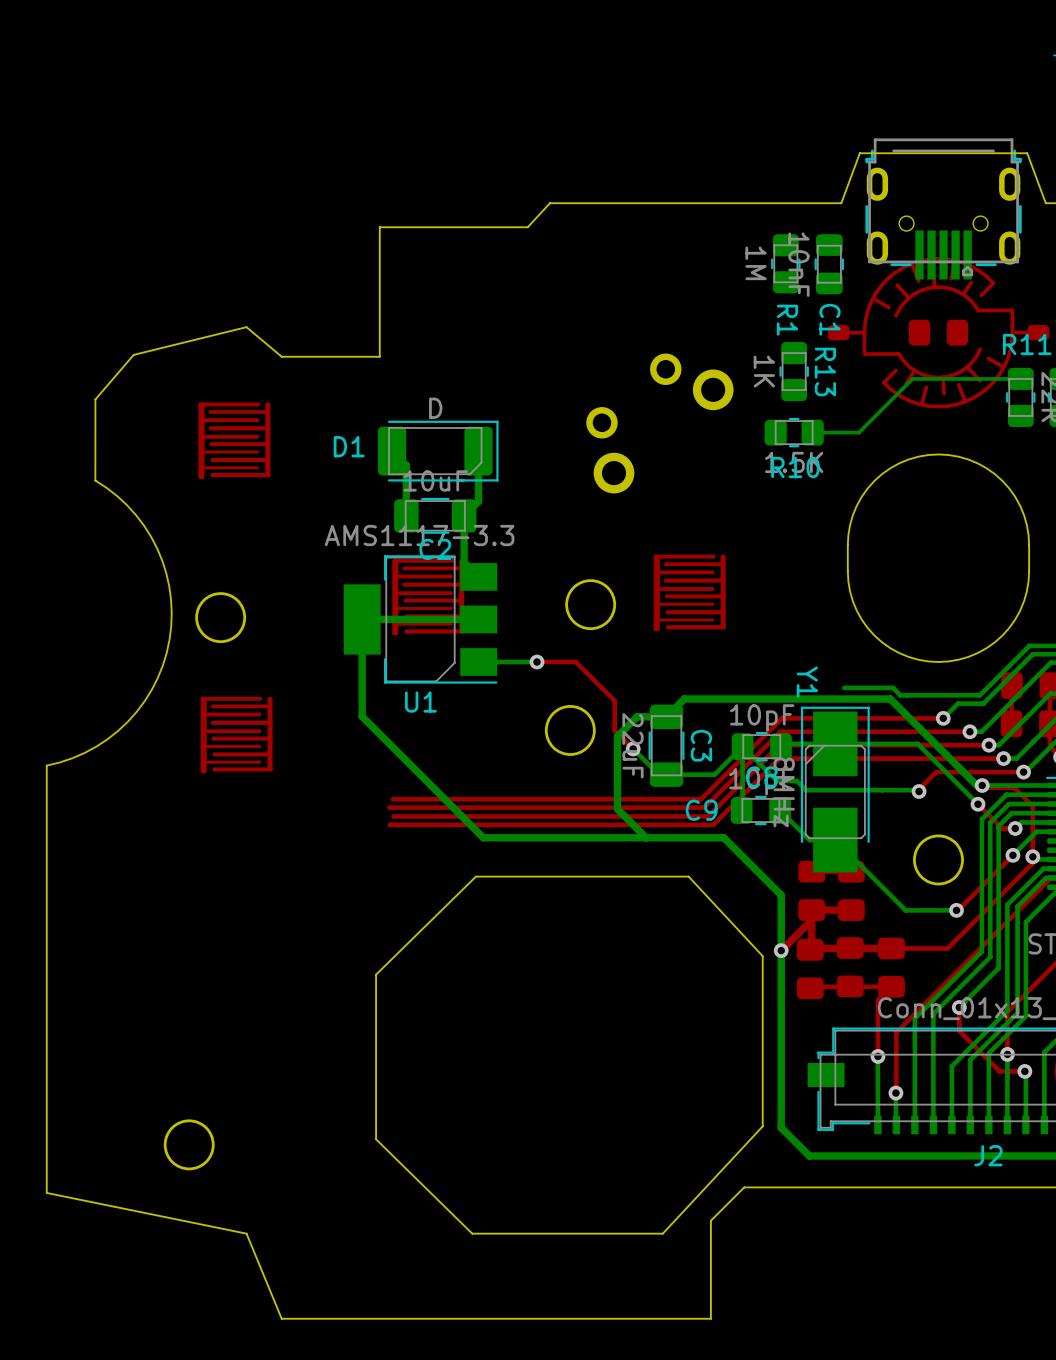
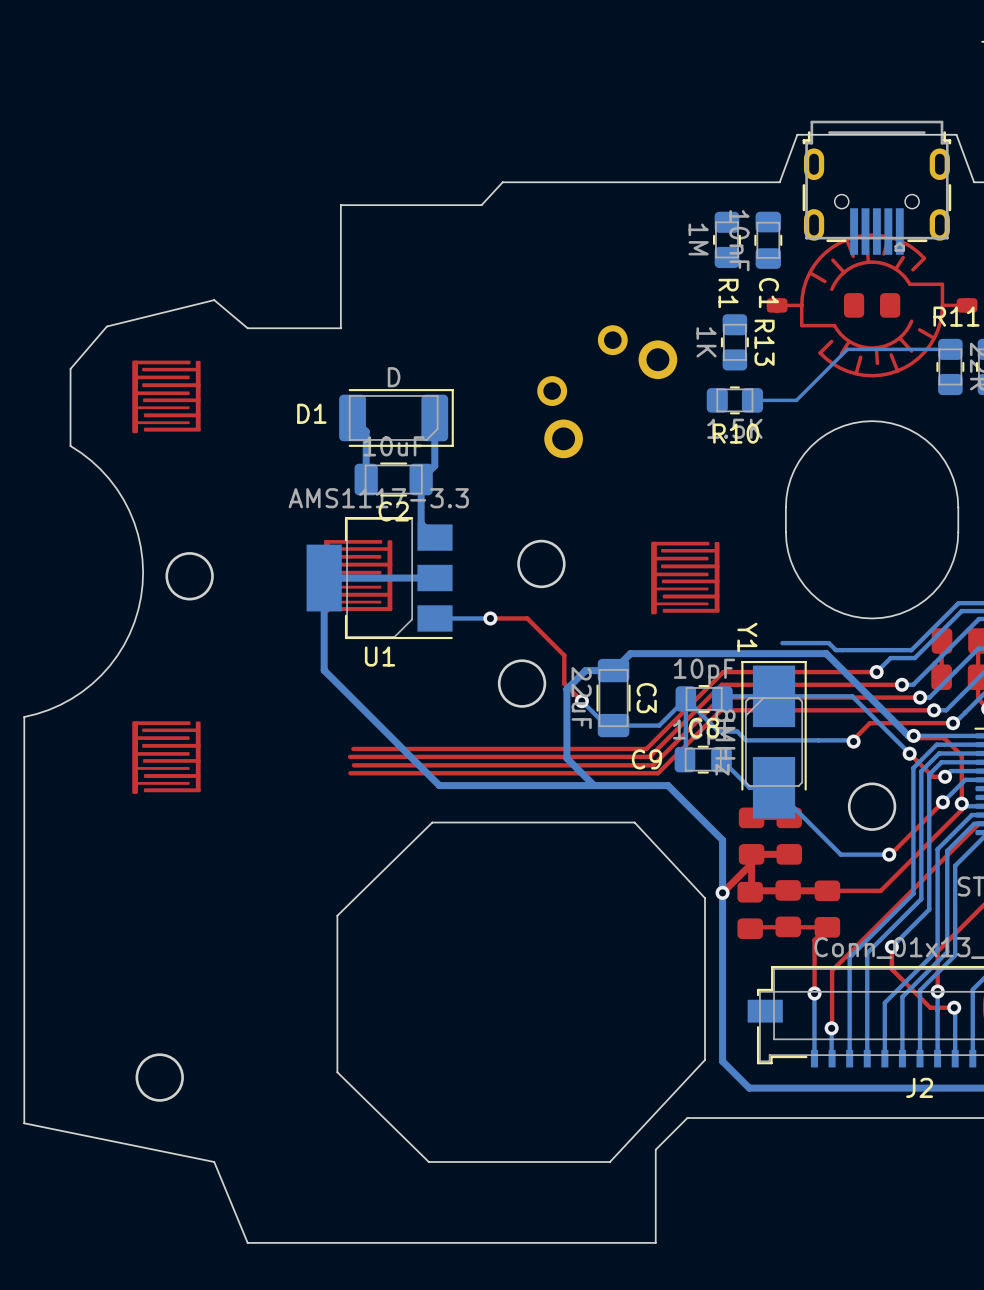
part position: (234, 440) -> (166, 396)
part position: (689, 592) -> (685, 578)
part position: (428, 596) -> (358, 576)
part position: (236, 735) -> (166, 757)

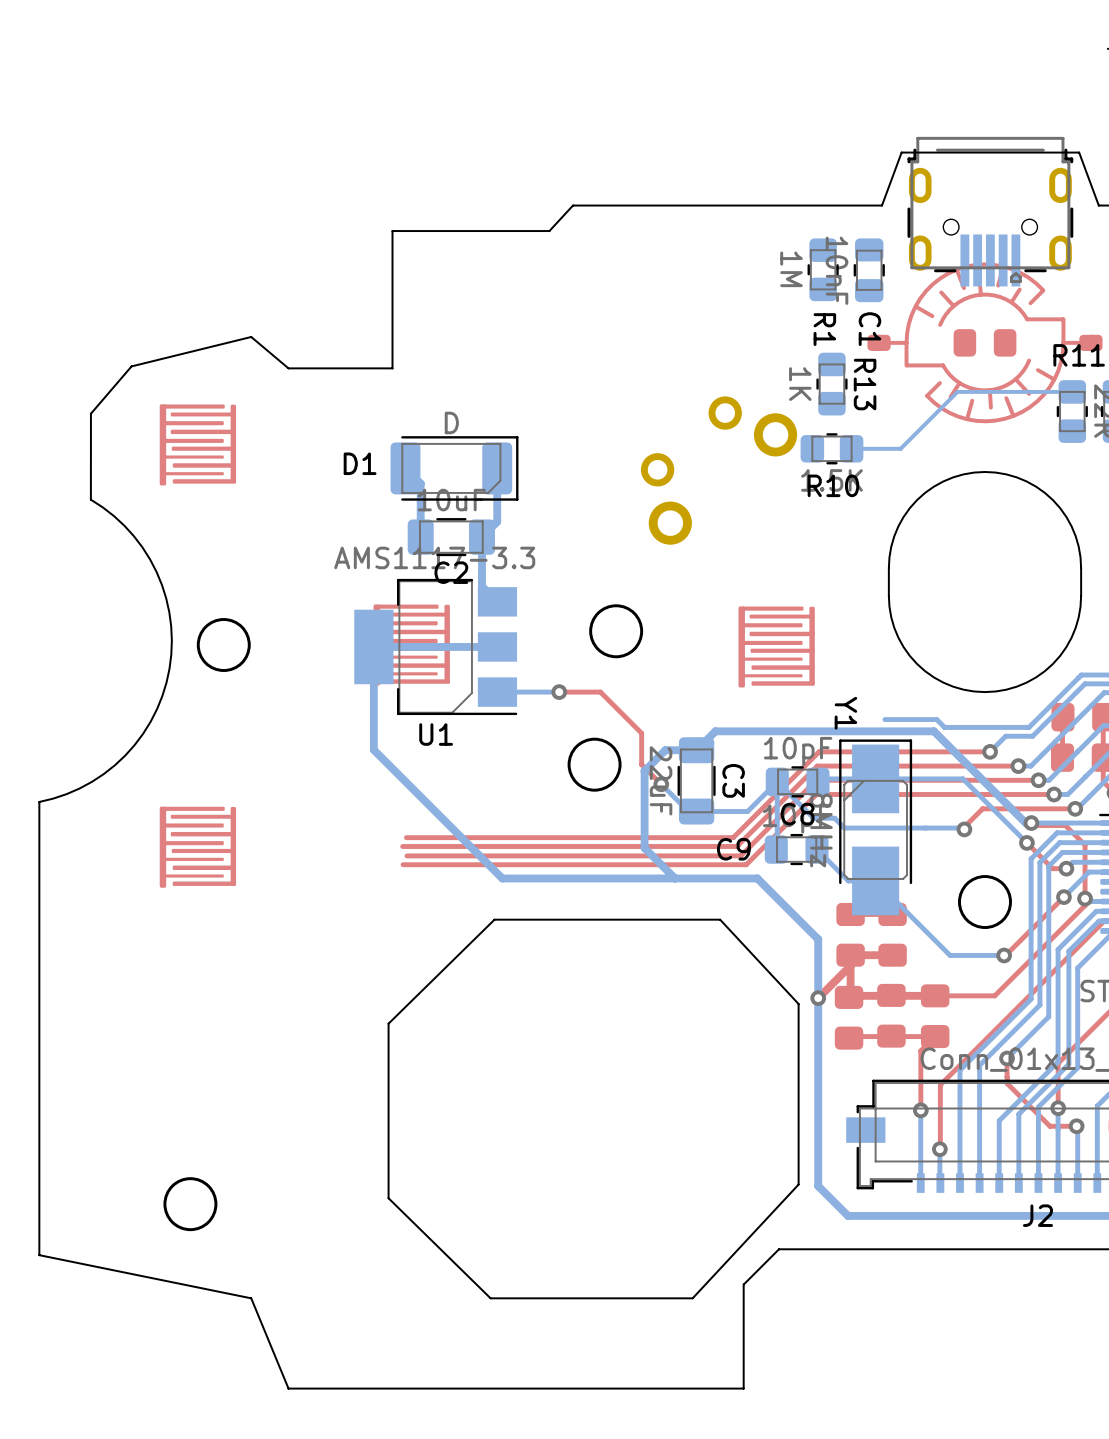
part position: (607, 391) -> (719, 470)

